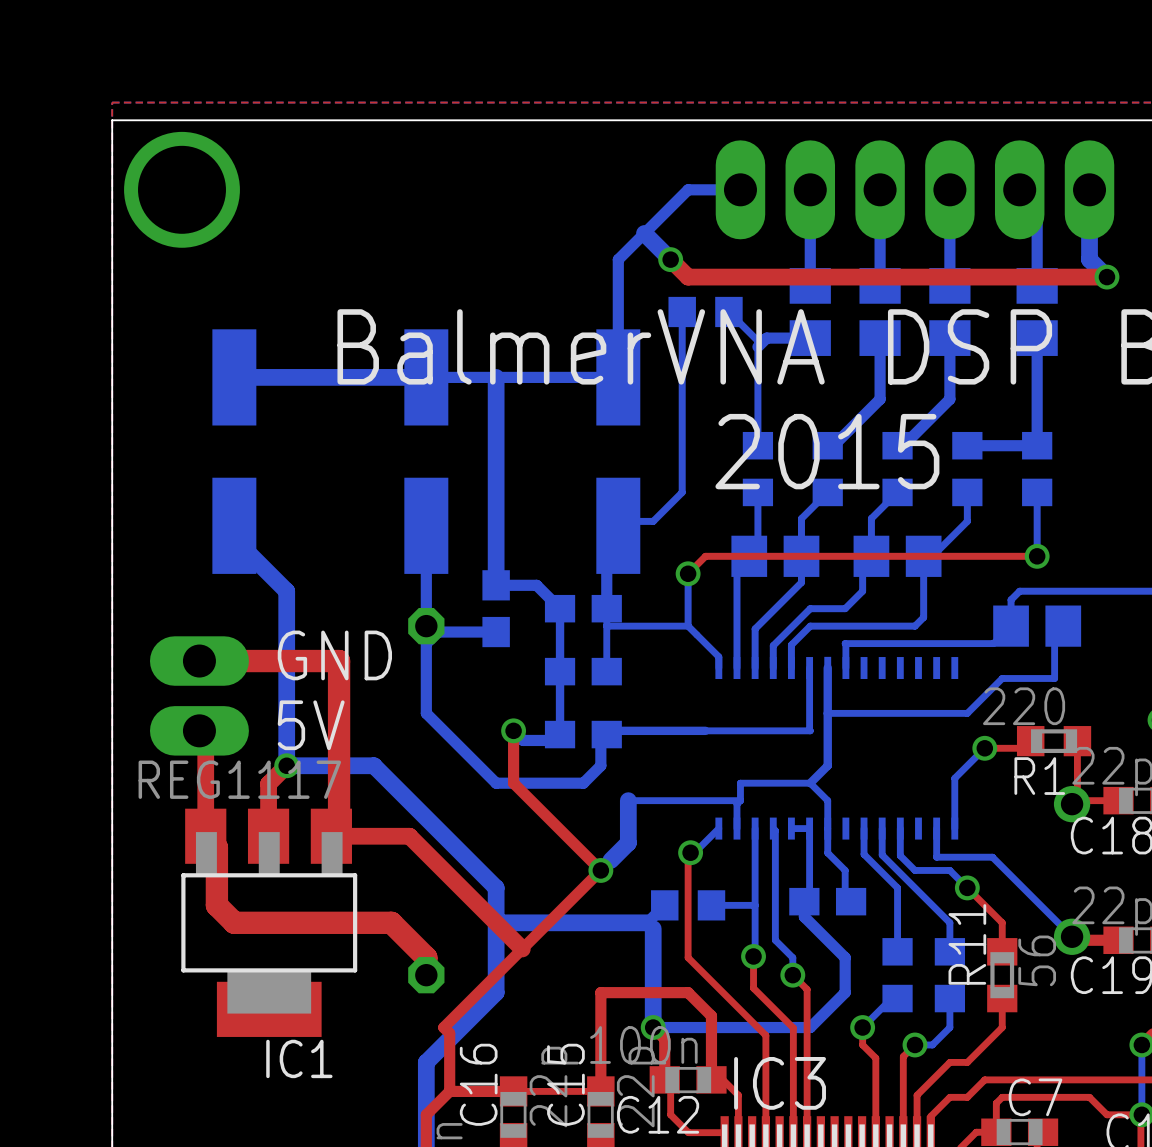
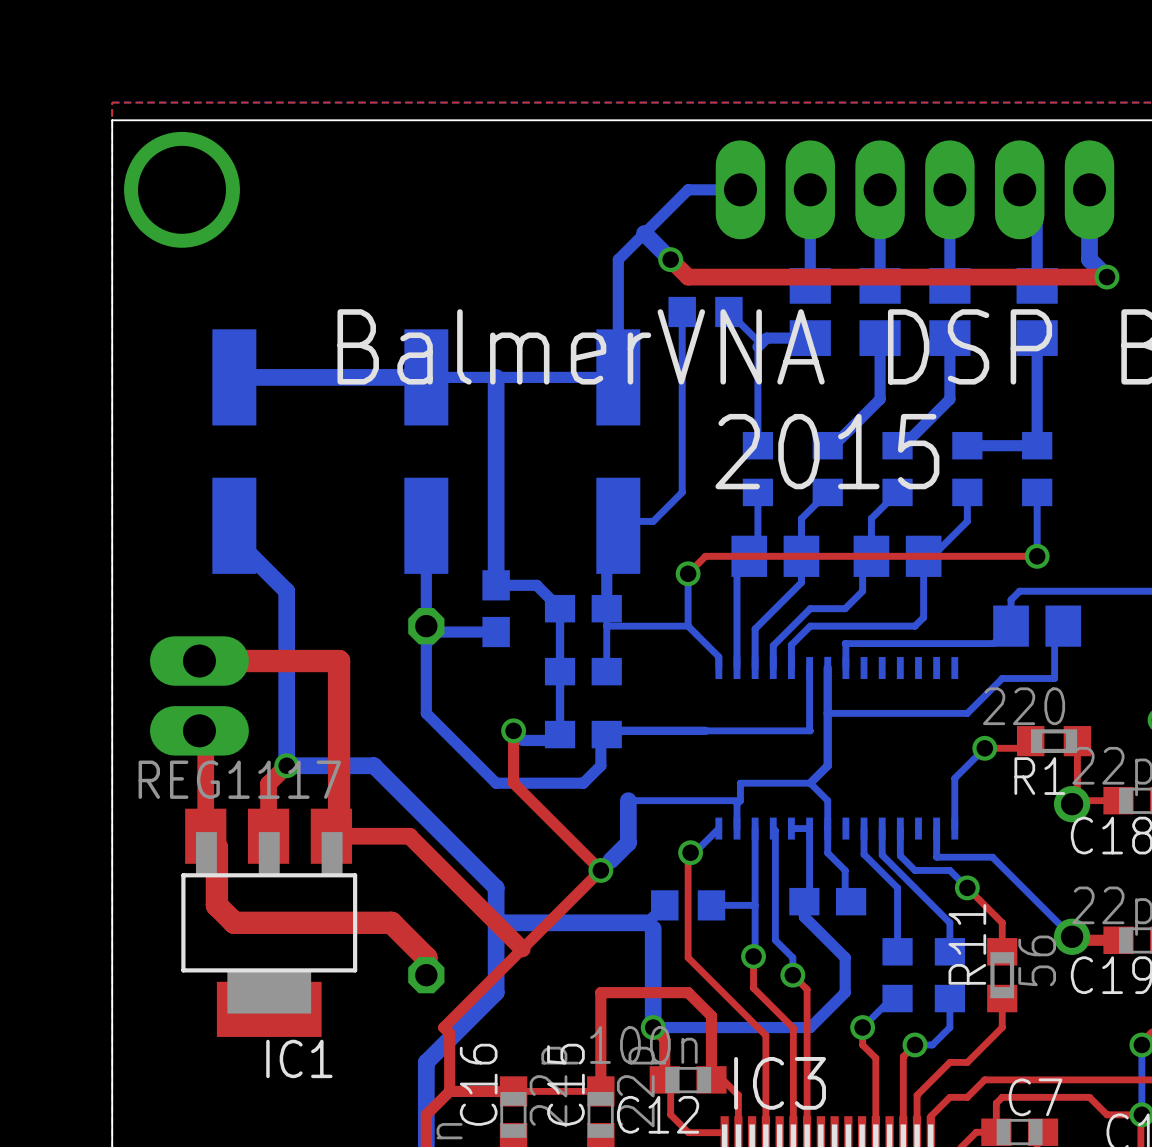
text: GND (334, 655) -> none
text: 5V (311, 725) -> none

